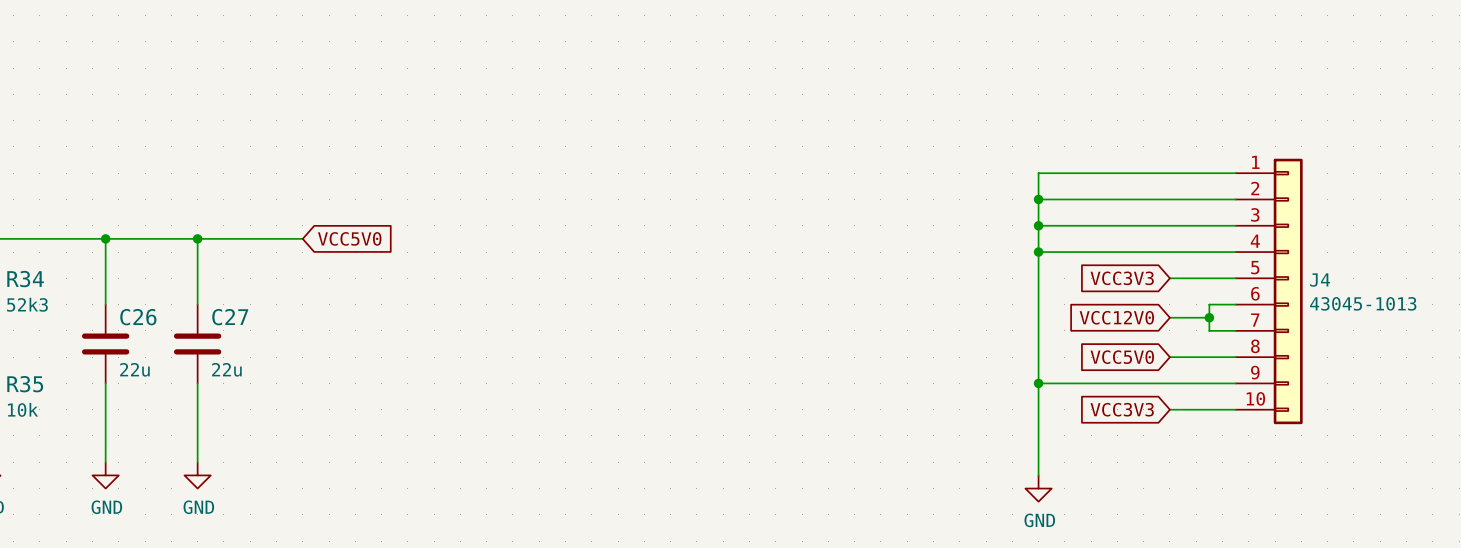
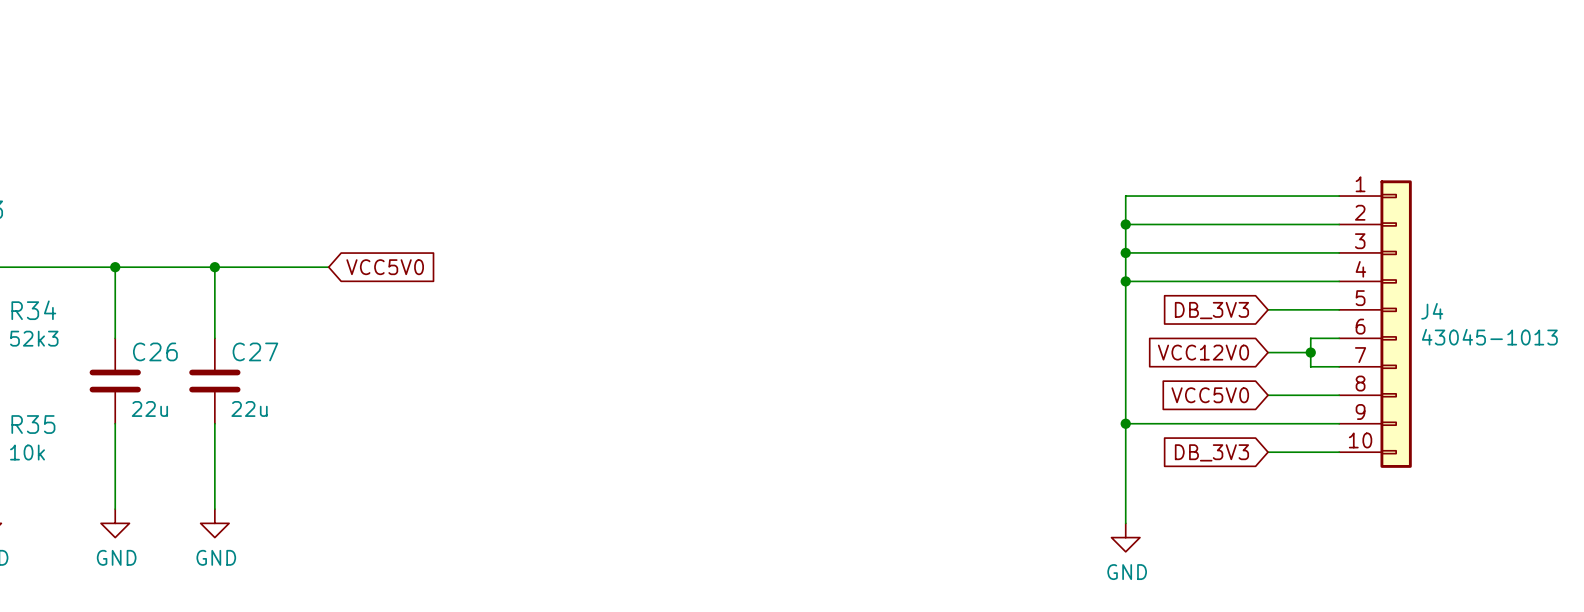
global label: VCC3V3 (1122, 278) -> DB_3V3 (1211, 310)
global label: VCC3V3 (1122, 409) -> DB_3V3 (1211, 452)

